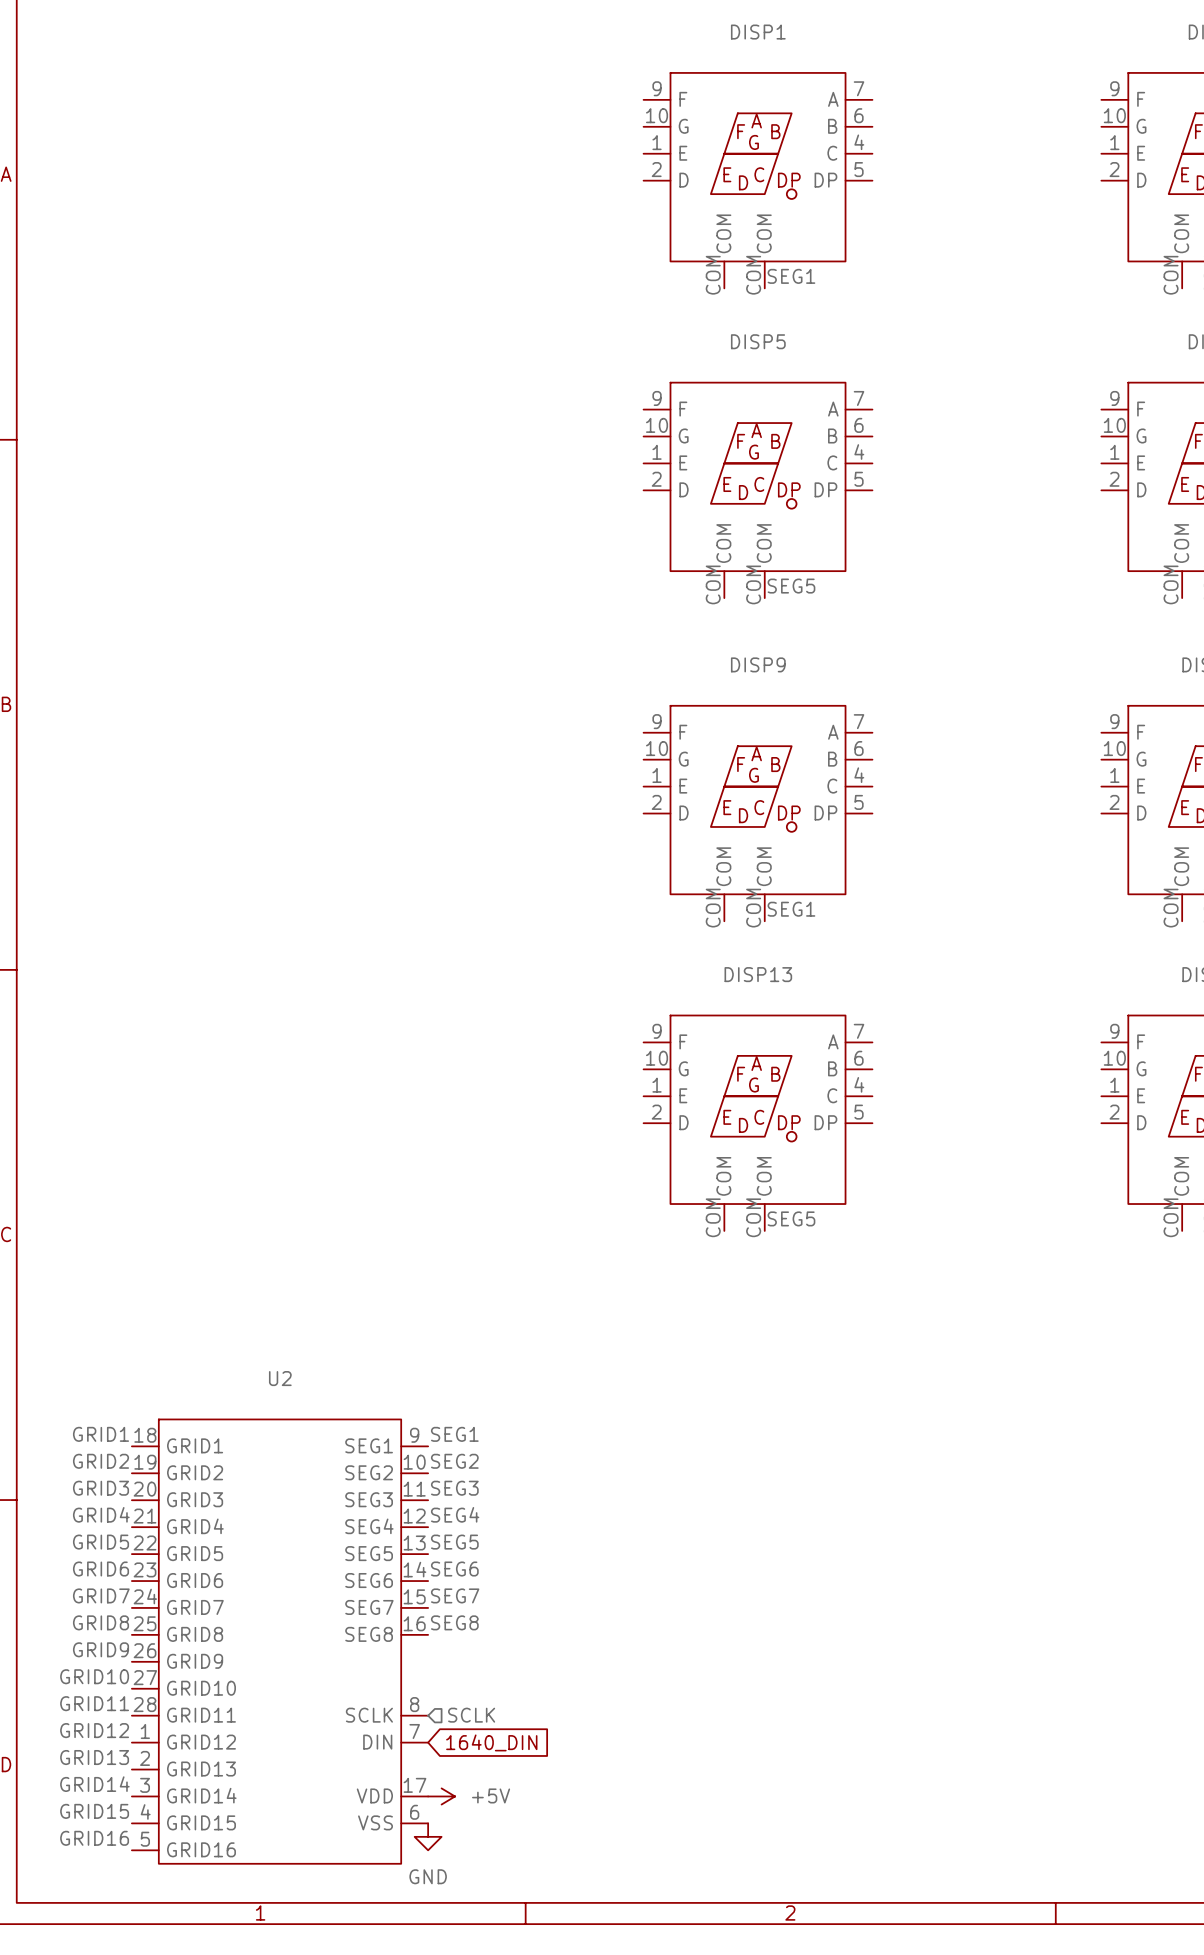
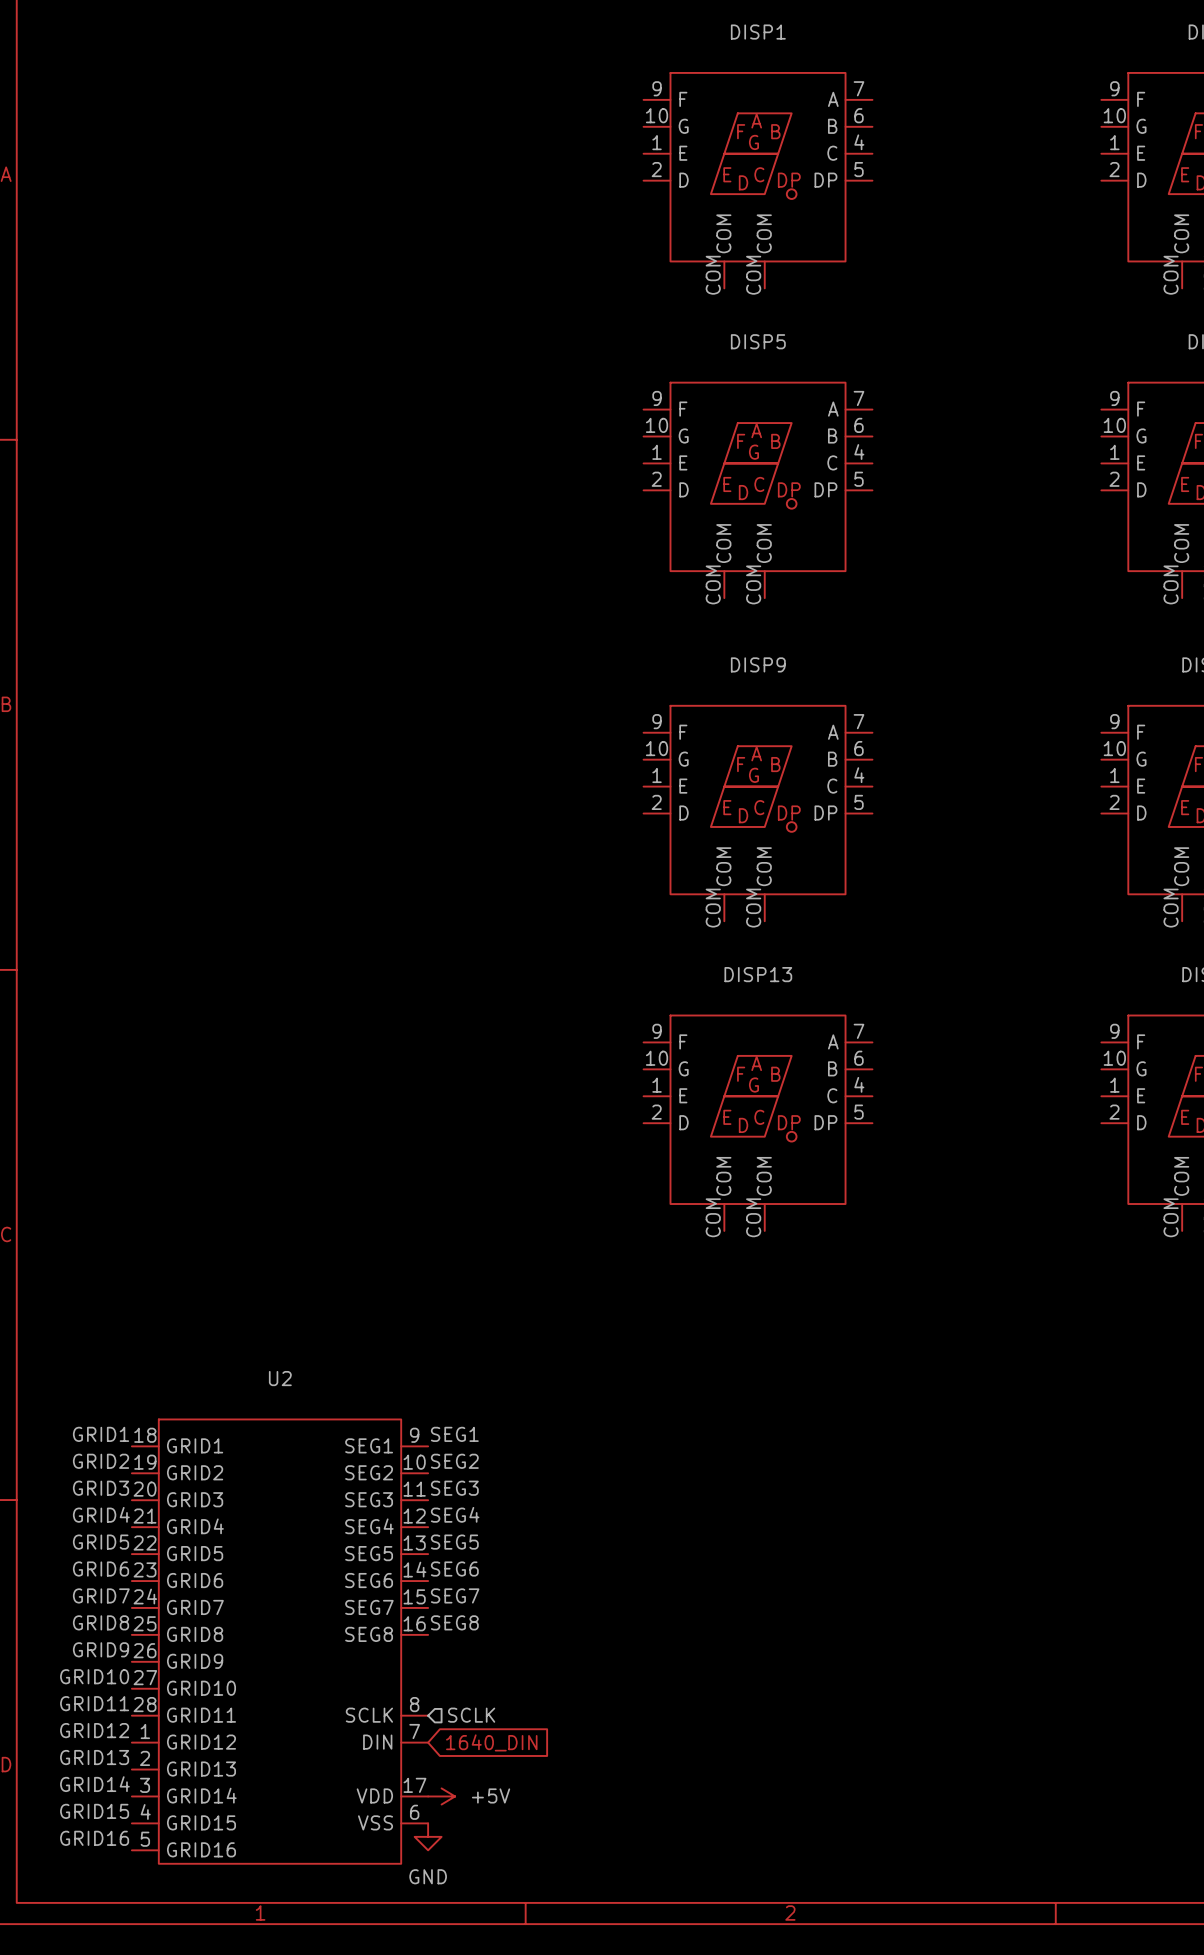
label: SEG1 (791, 276) -> none
label: SEG5 (791, 586) -> none
label: SEG1 (791, 909) -> none
label: SEG5 (791, 1218) -> none

